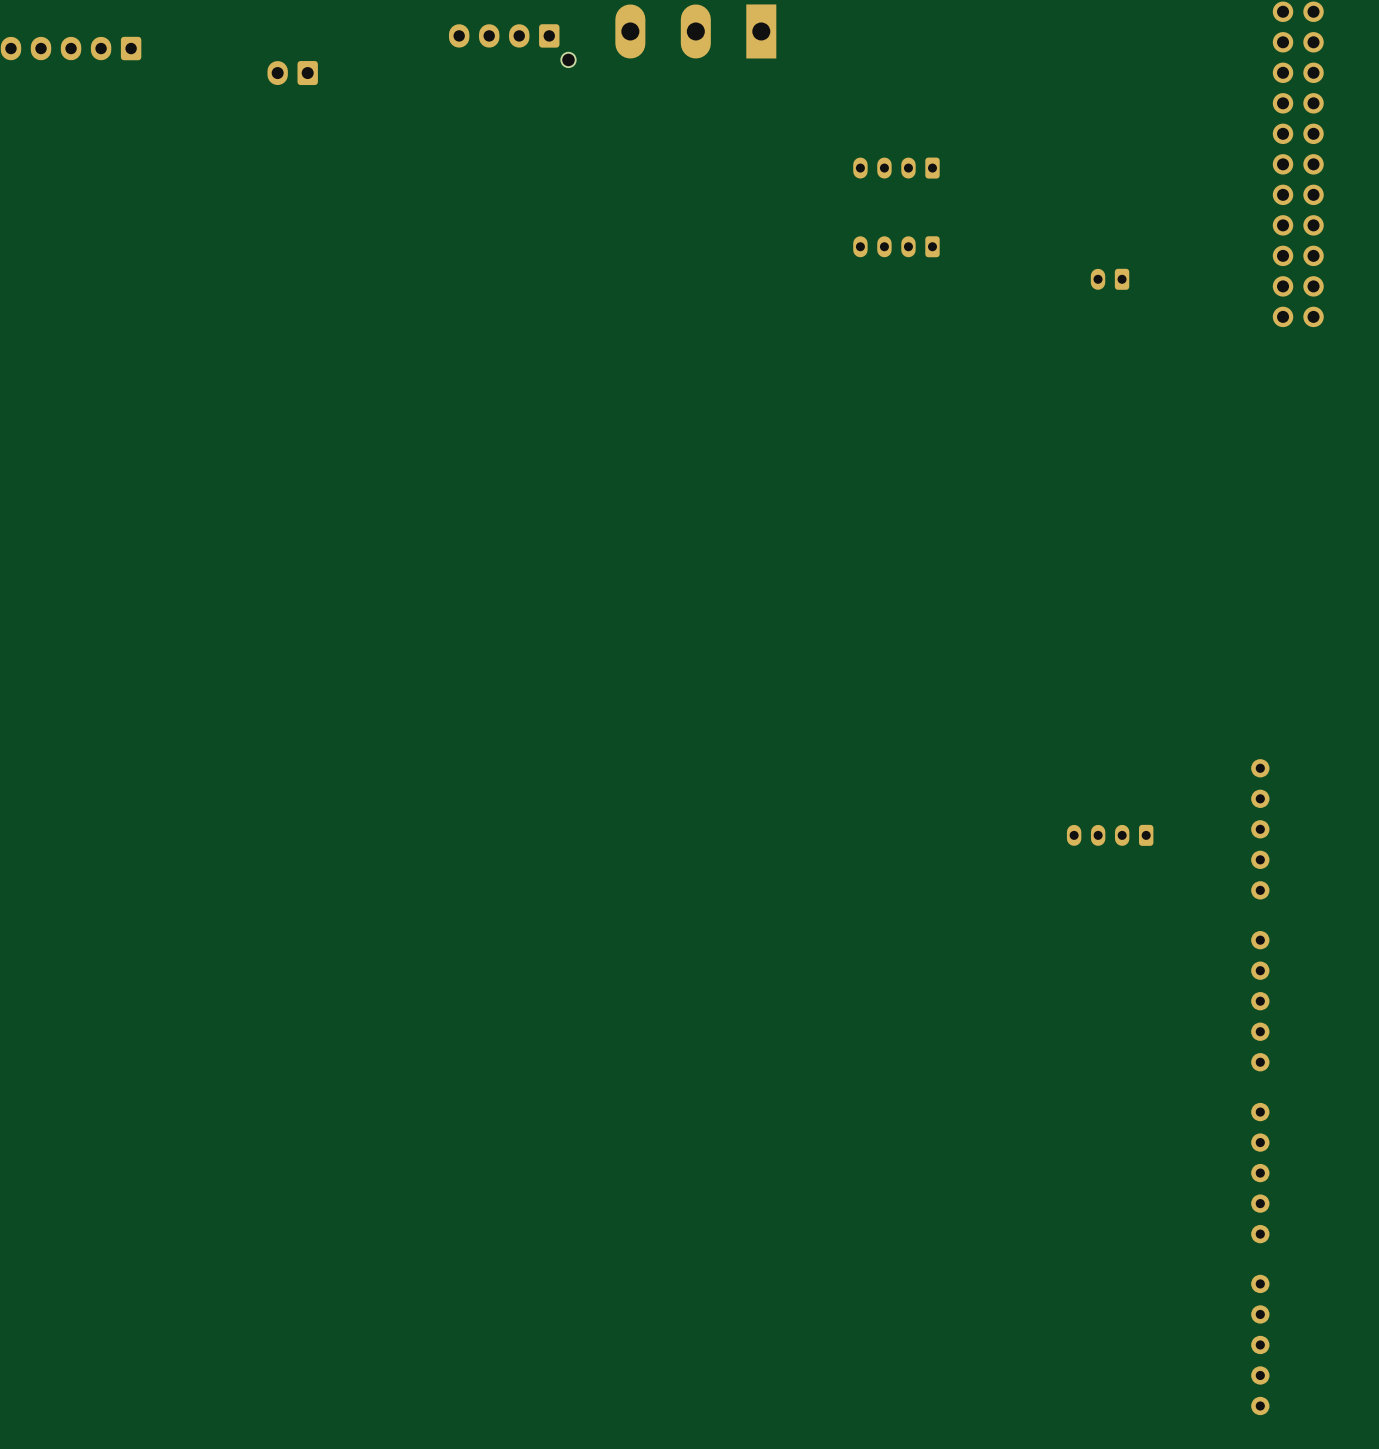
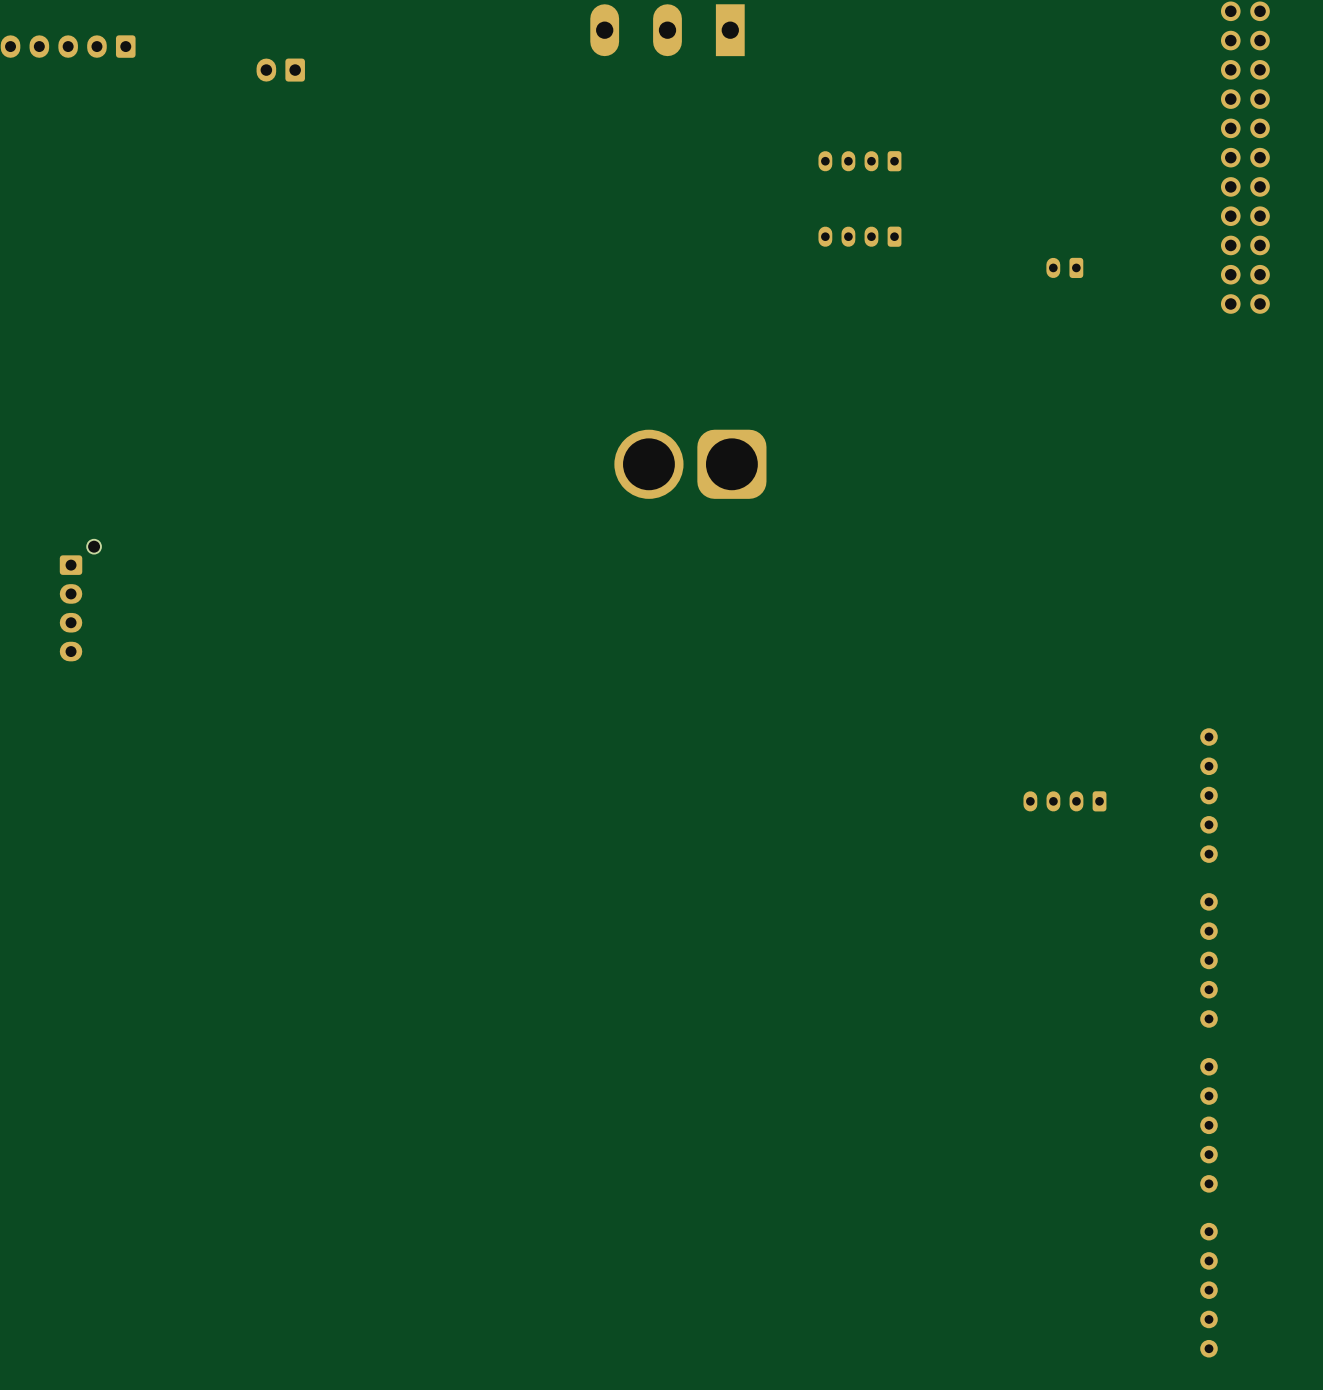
part: (512, 45) -> none
part: none -> (690, 464)
part: none -> (80, 600)

